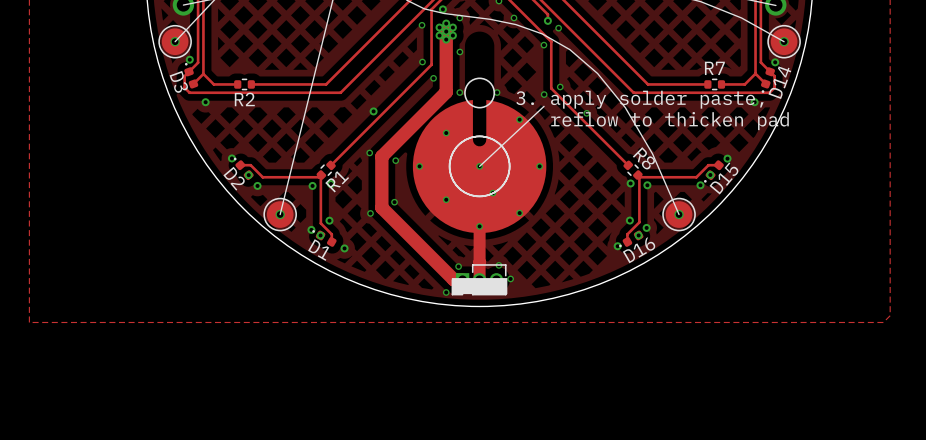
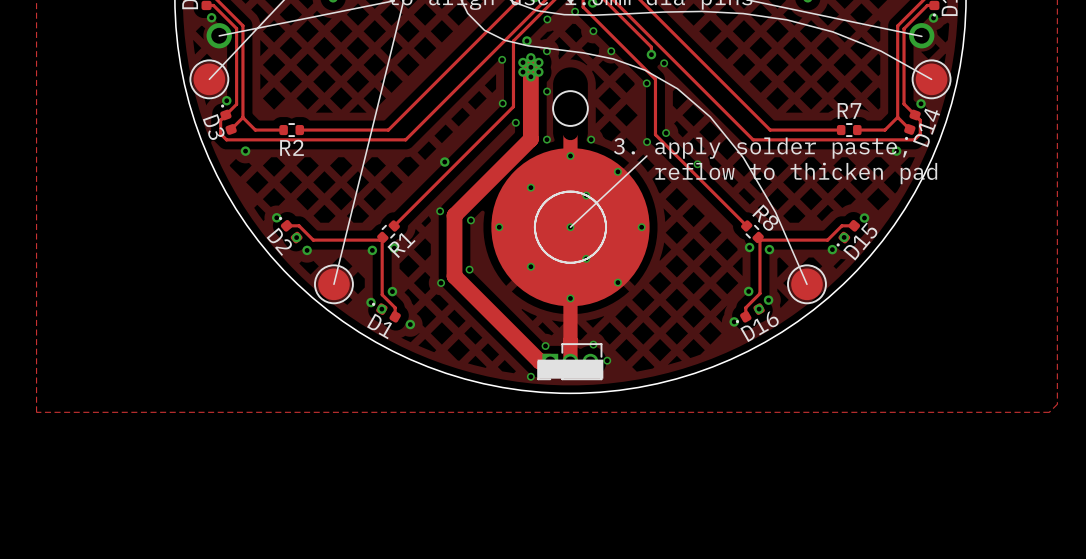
via: (175, 41) -> none
via: (784, 41) -> none
part: none -> (570, 108)
part: (479, 93) -> none
via: none -> (570, 156)
via: none -> (586, 195)
via: (280, 214) -> none
via: (679, 214) -> none

